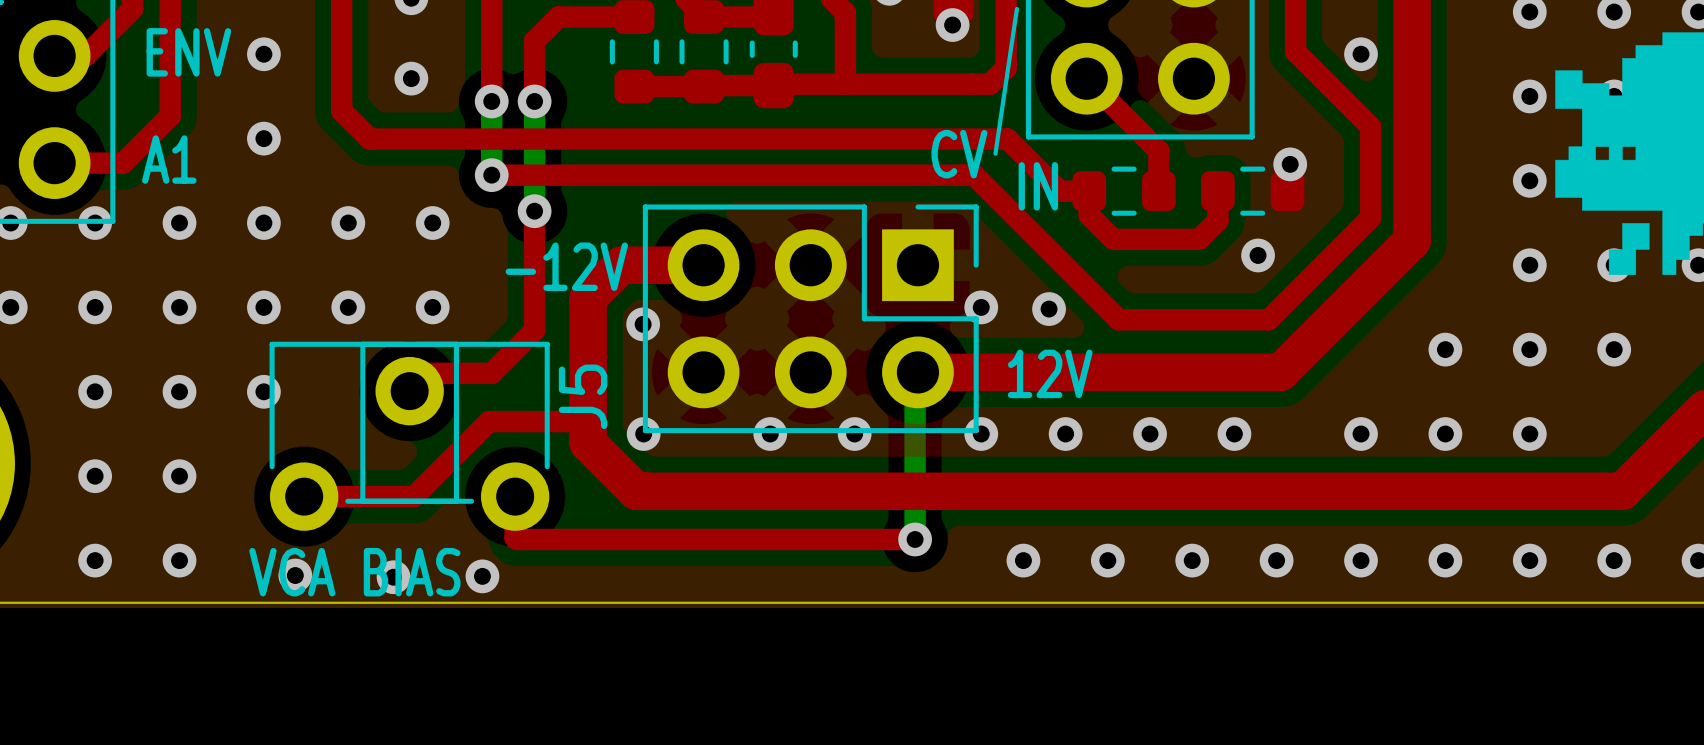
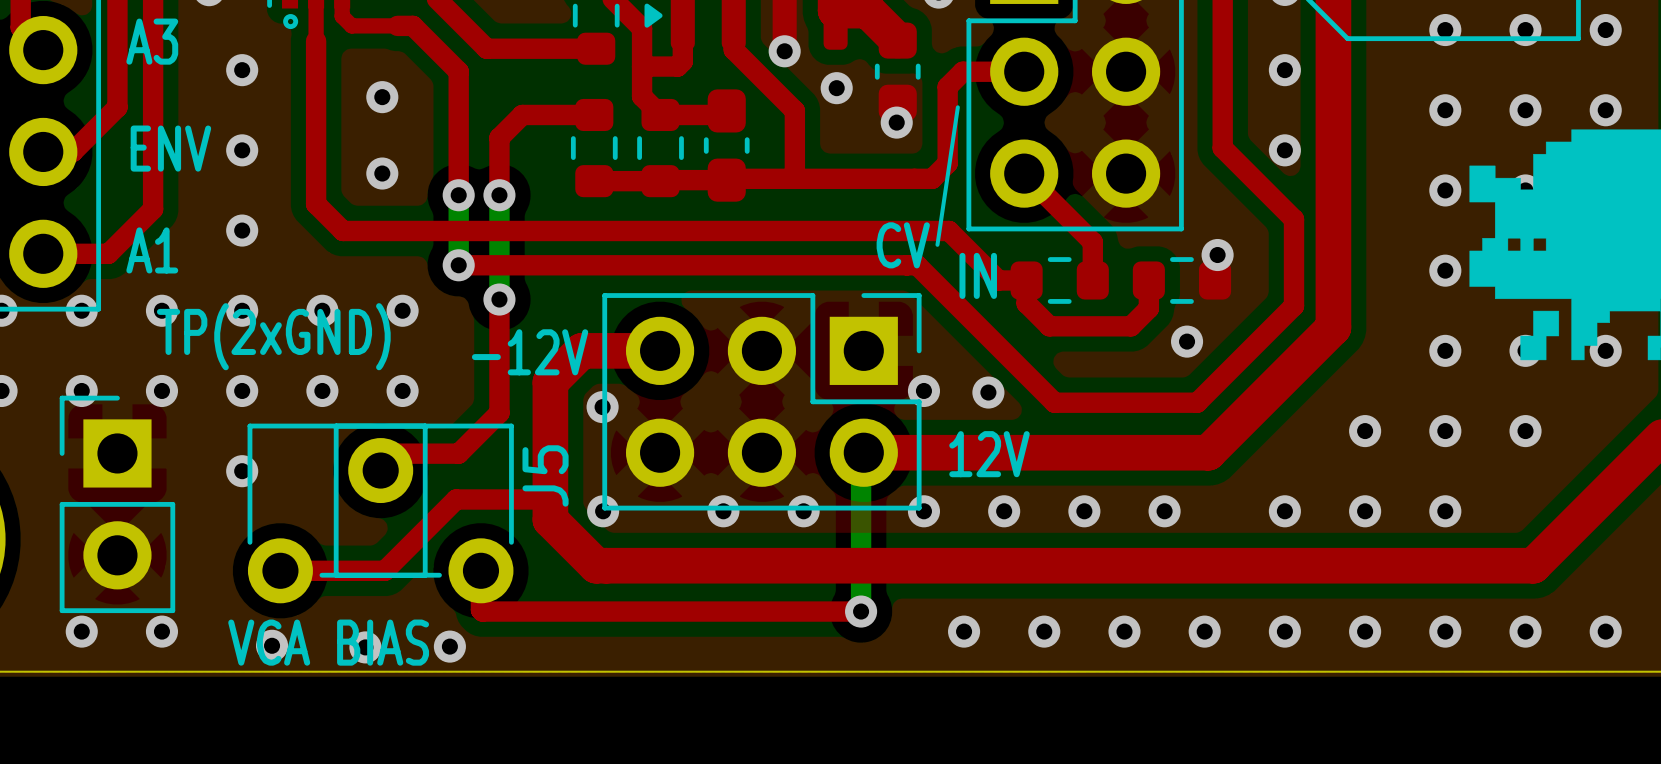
text: none -> TP(2xGND) (273, 336)
via: (95, 391) -> none
via: (179, 391) -> none
part: none -> (117, 504)
via: (95, 476) -> none
via: (179, 476) -> none

